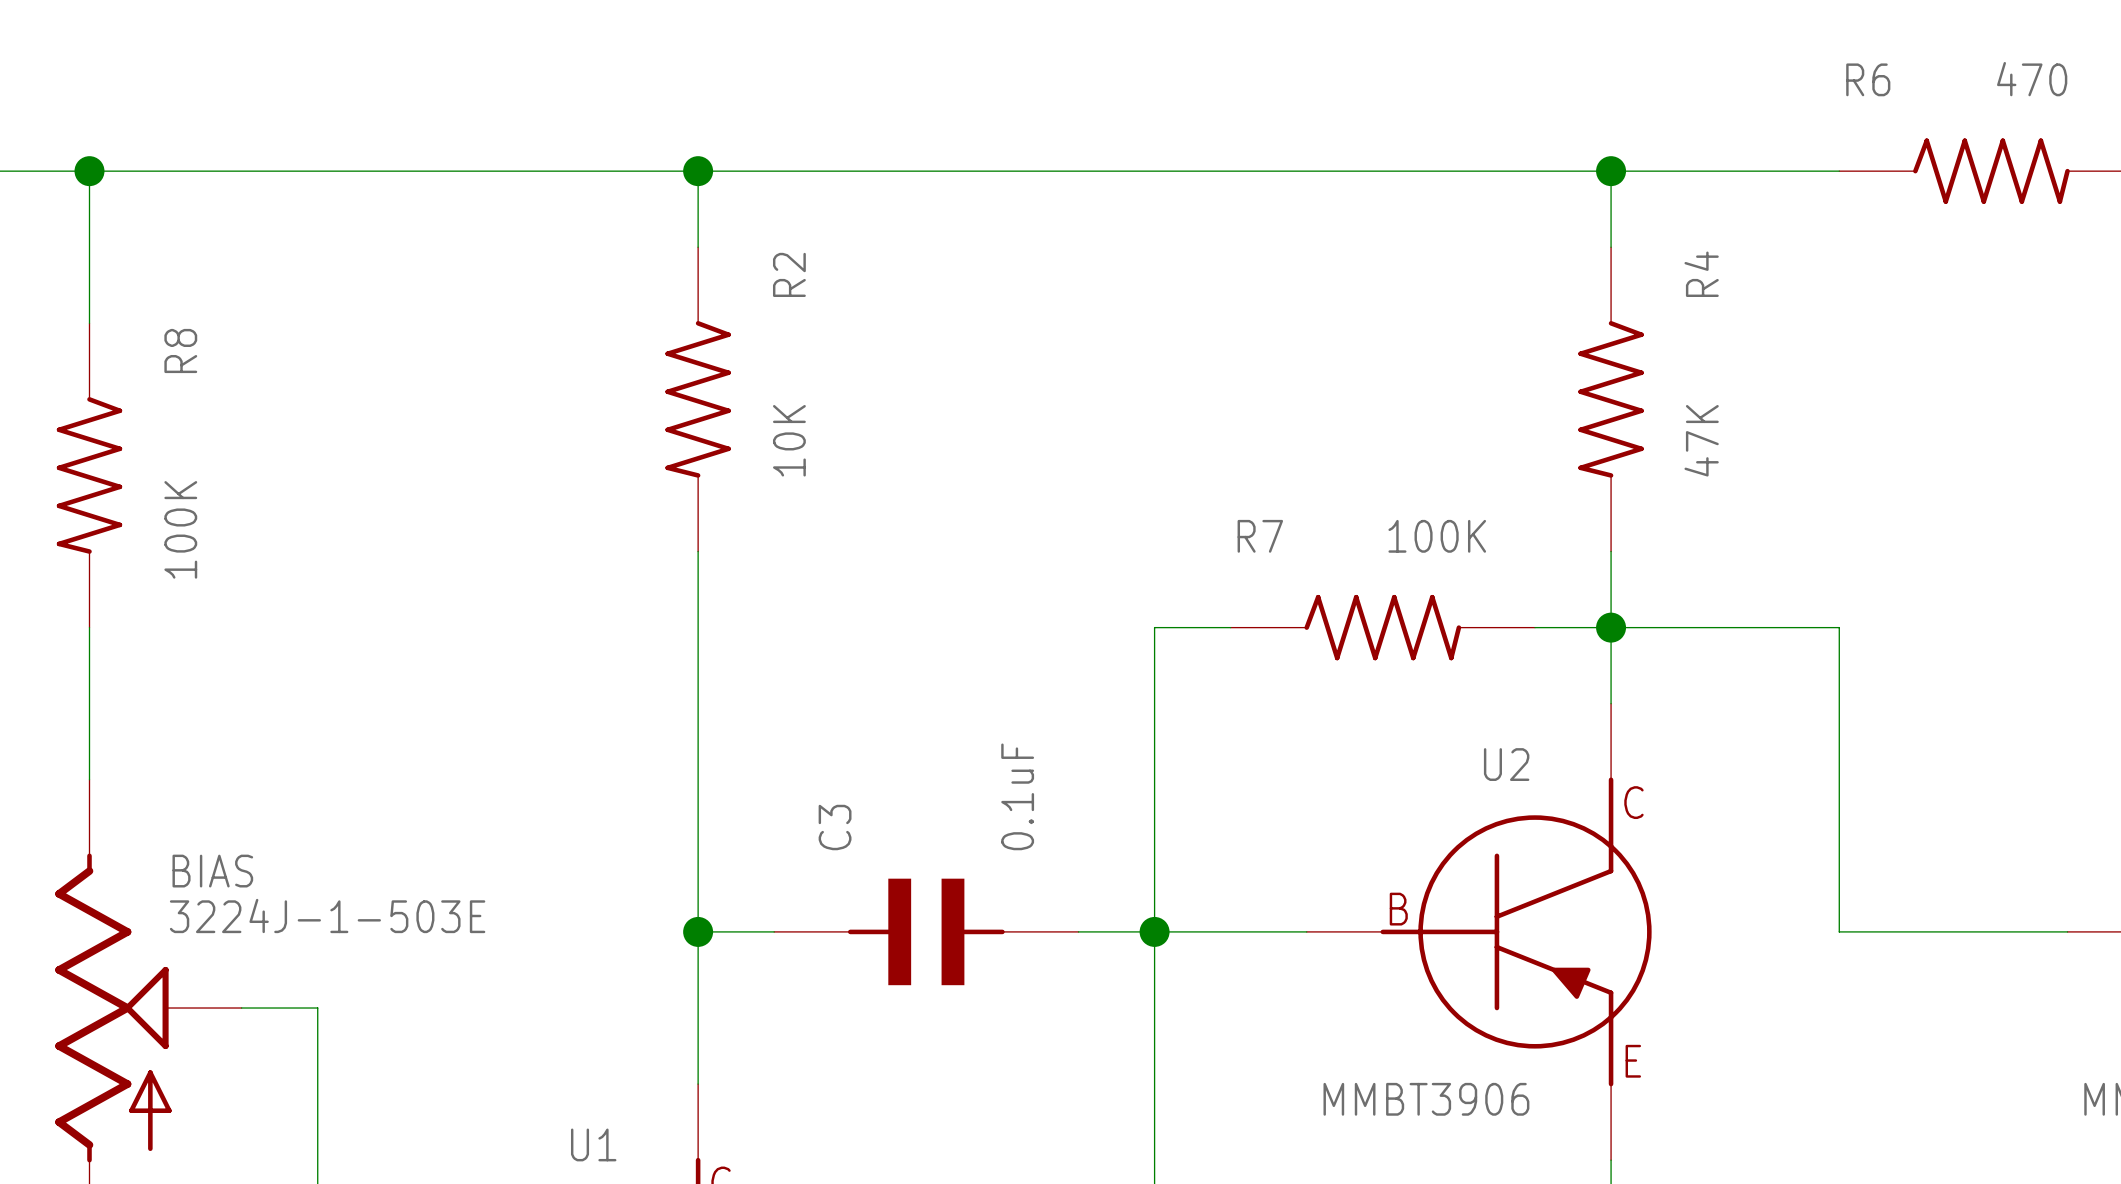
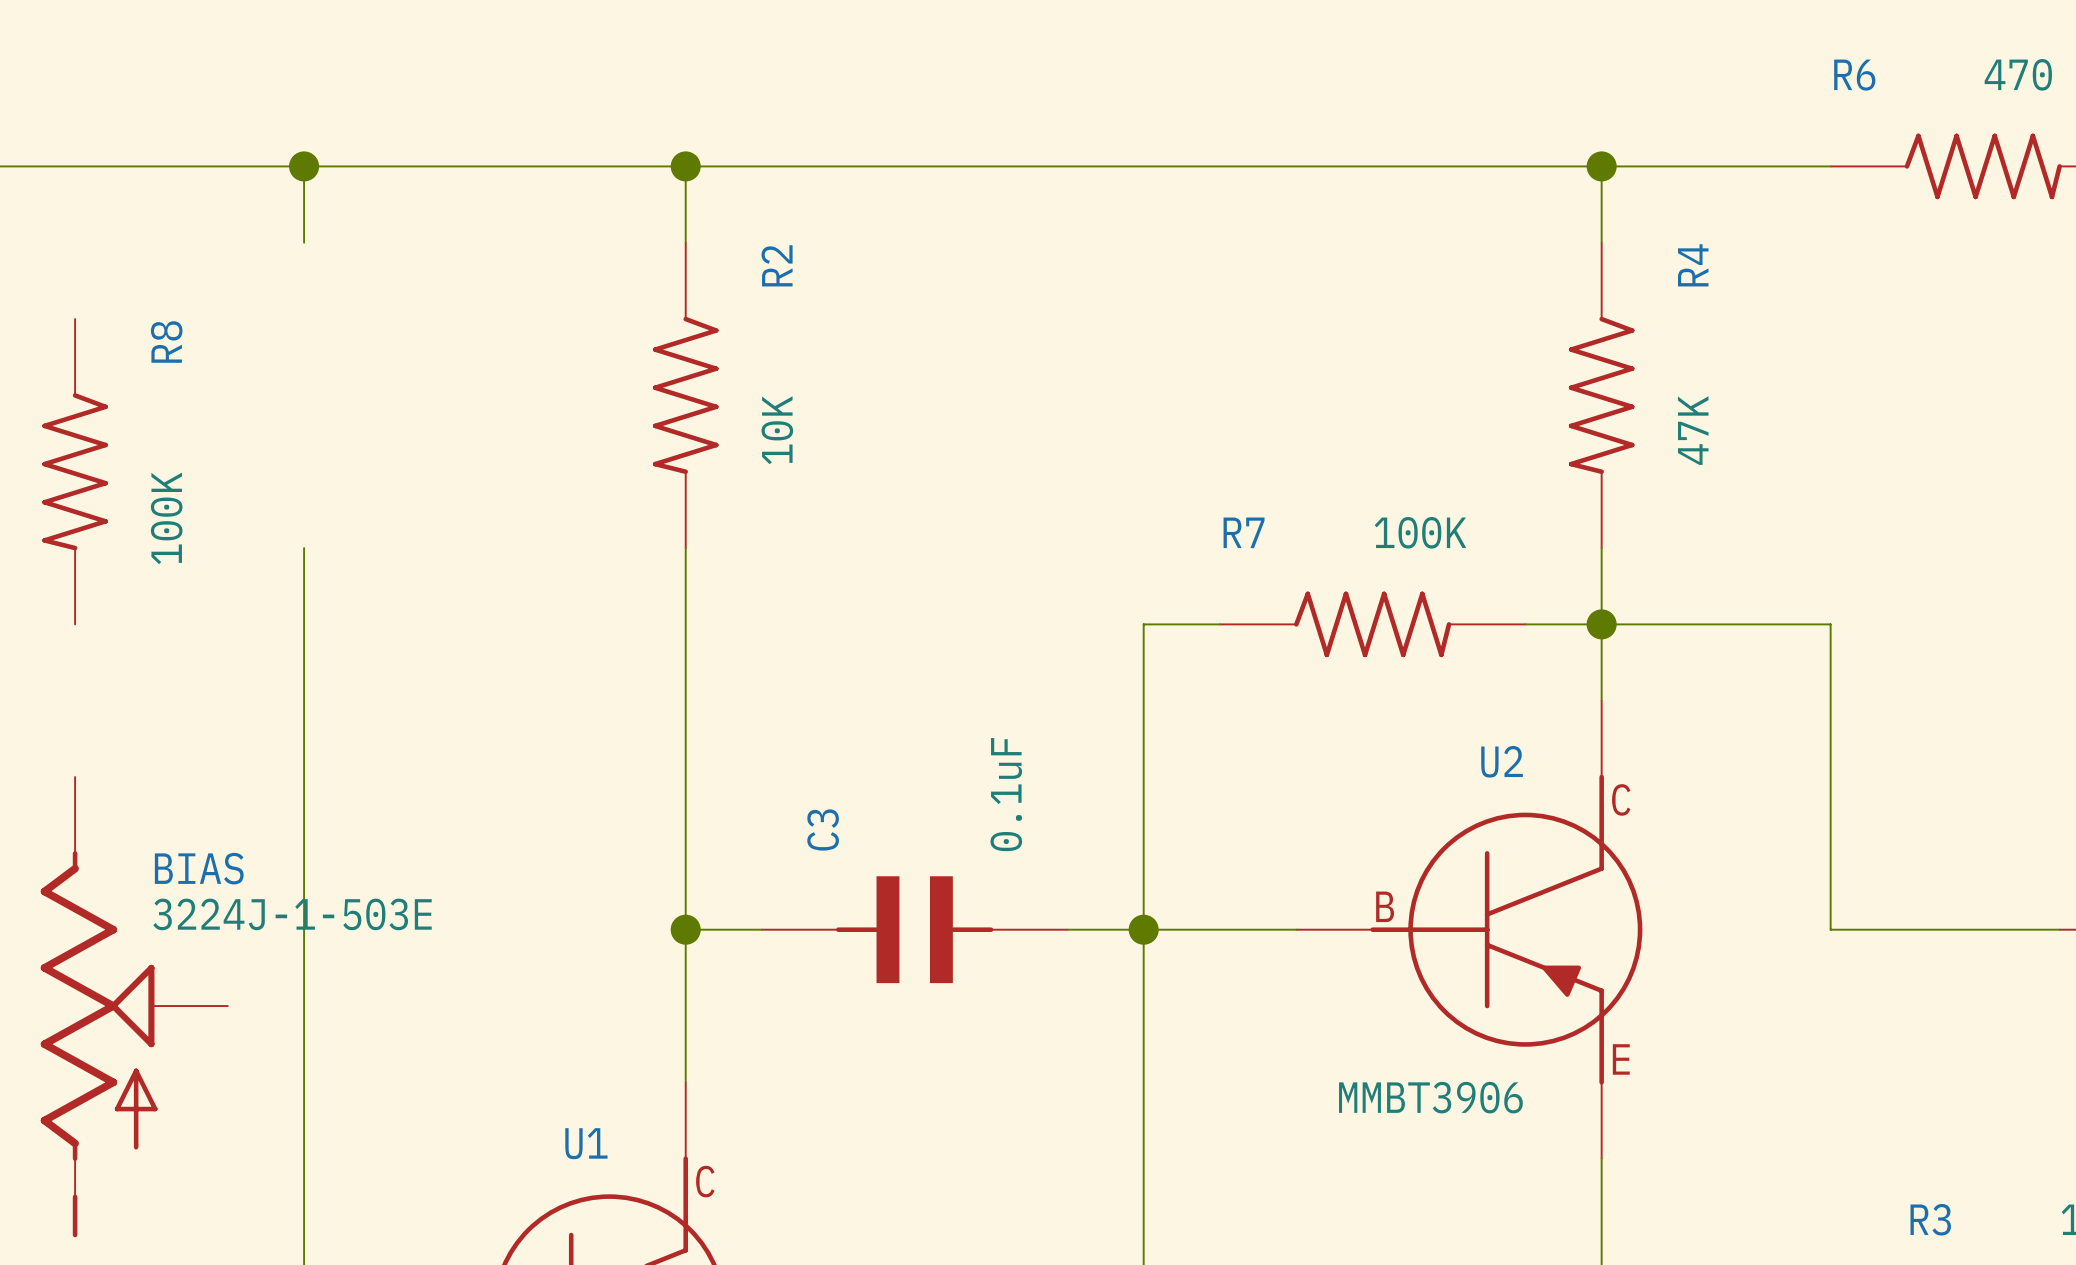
wire: (89, 171) (89, 323) -> none
junction: (89, 171) -> none
wire: none -> (304, 166) (304, 242)
junction: none -> (304, 166)
wire: (89, 627) (89, 779) -> none
wire: (241, 1008) (317, 1008) -> (304, 548) (304, 1006)

